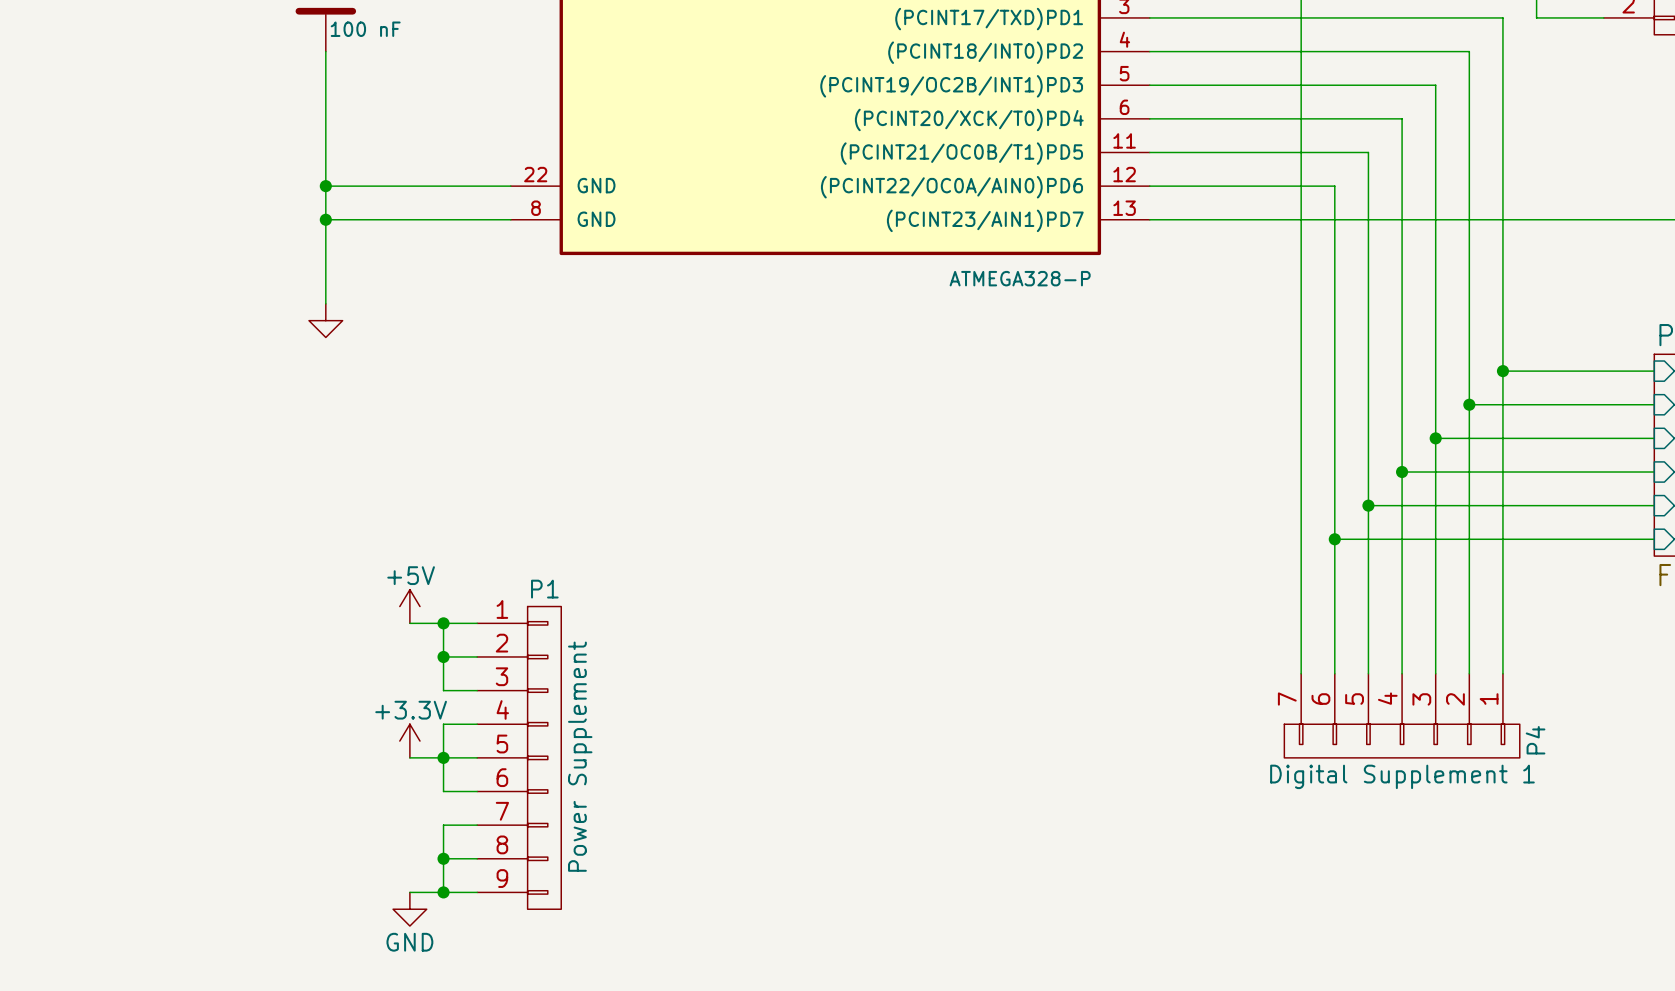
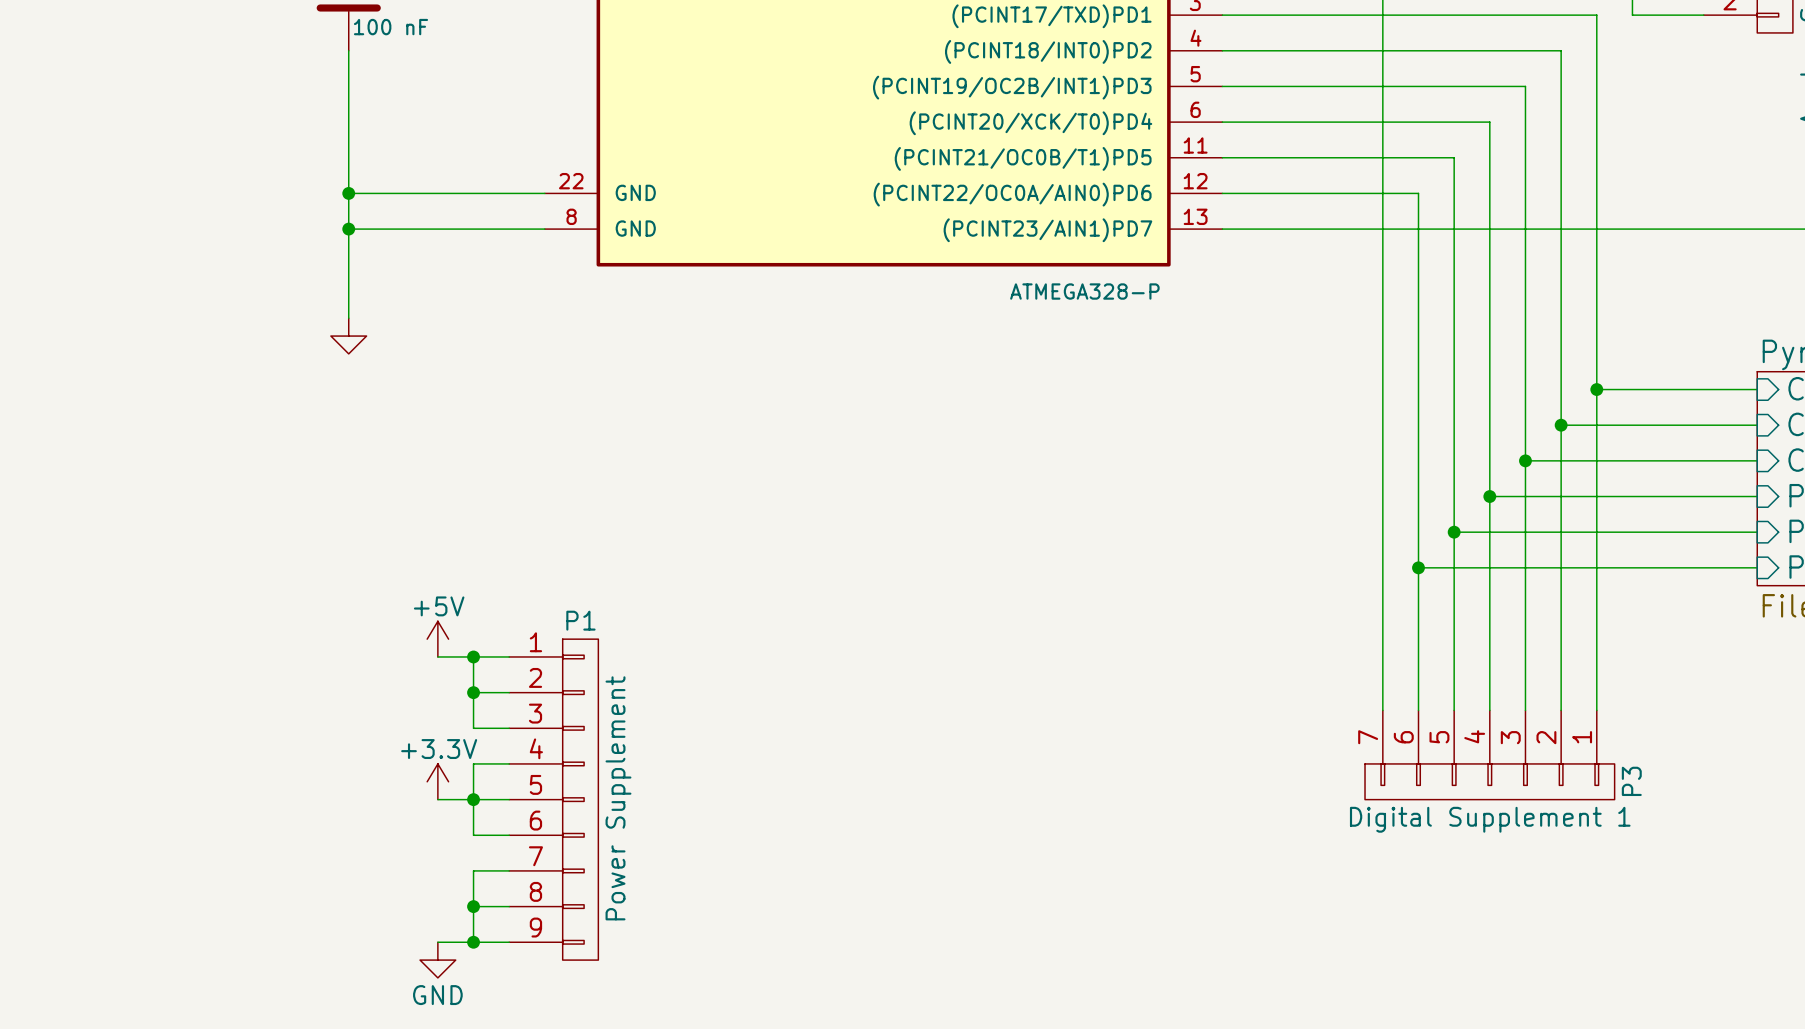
P4 name: P4 (1535, 740) -> P3 (1631, 781)

